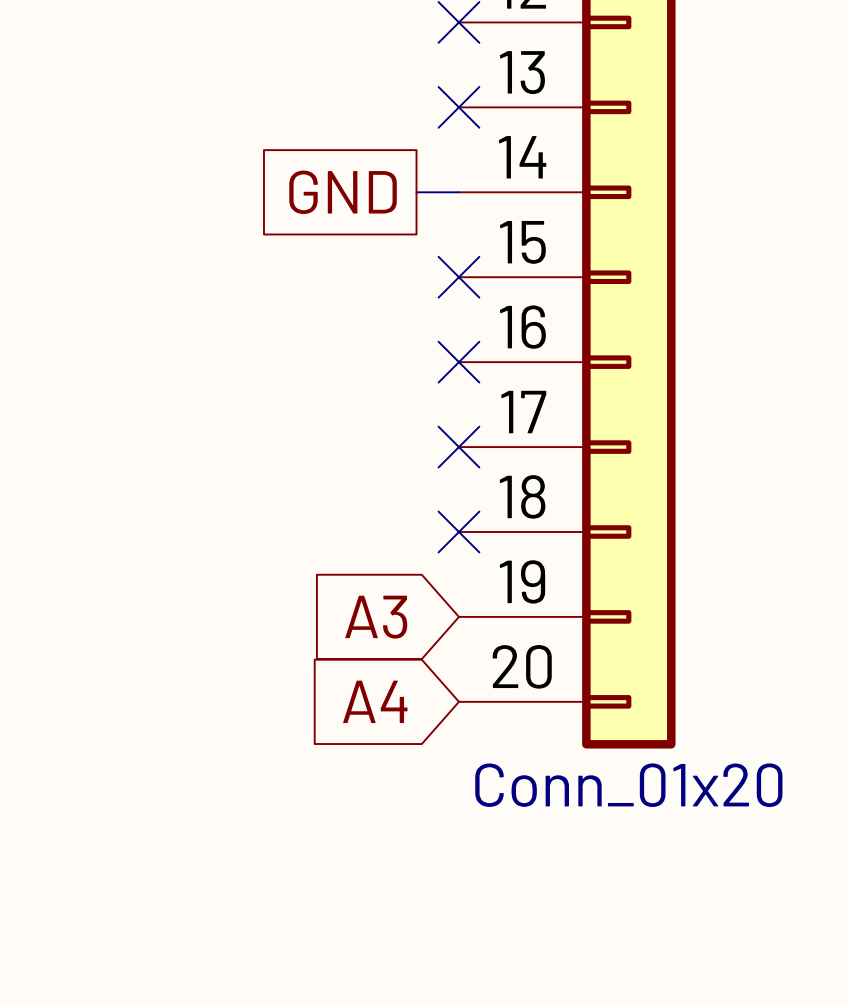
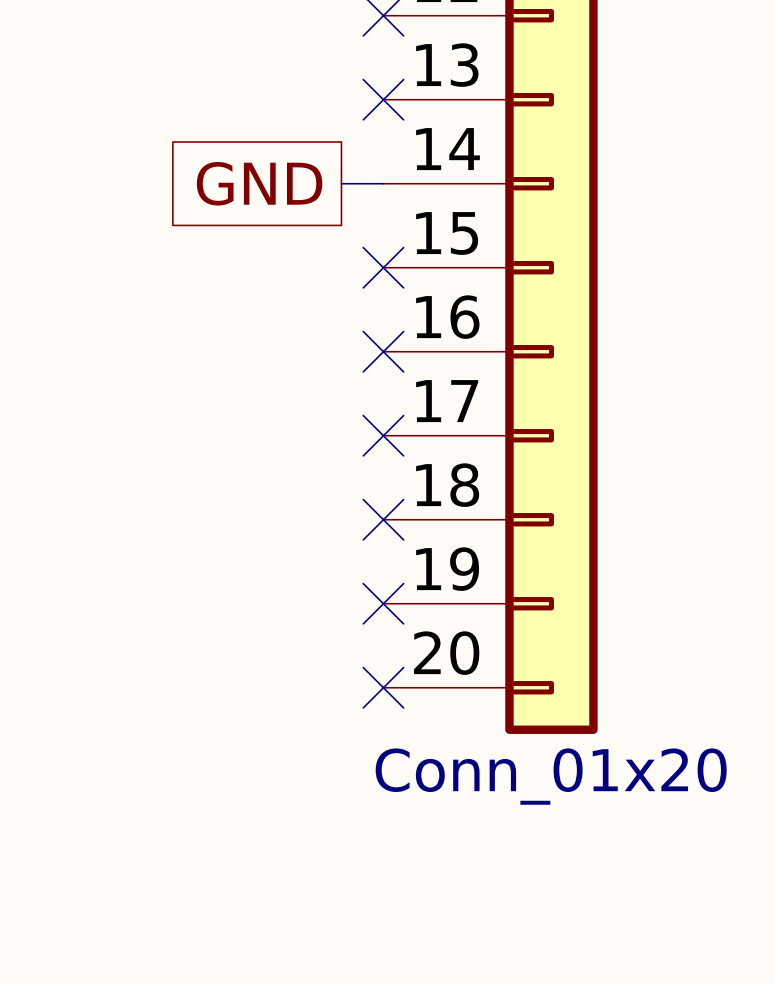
no-connect mark: none -> (383, 603)
global label: A3 (376, 617) -> none
global label: A4 (375, 701) -> none
no-connect mark: none -> (383, 687)

